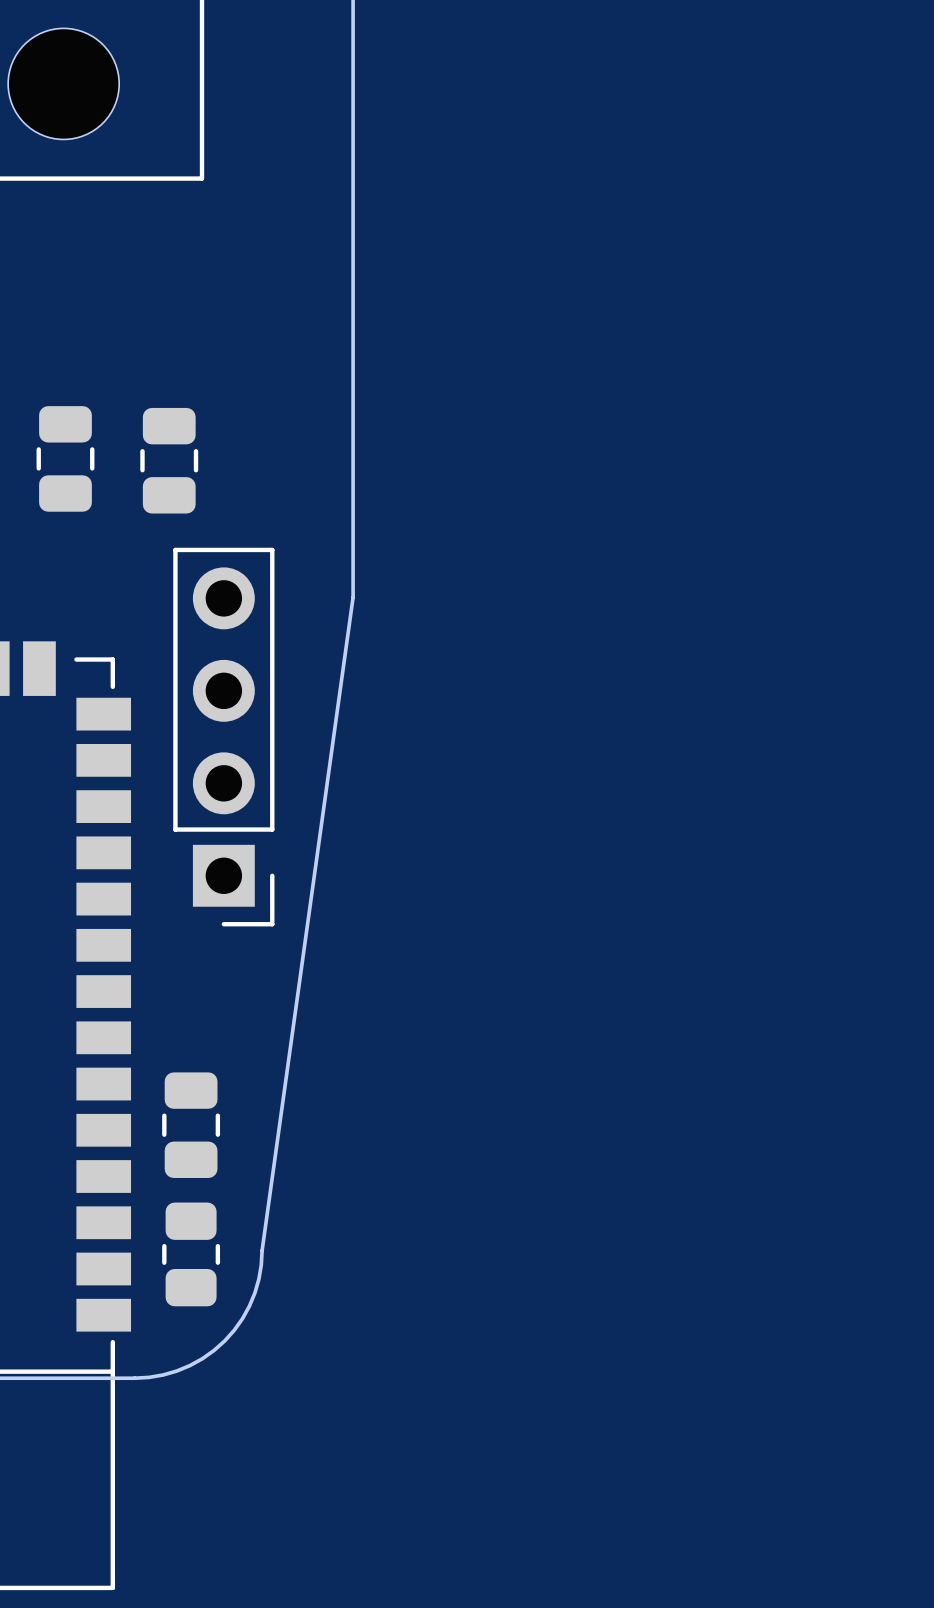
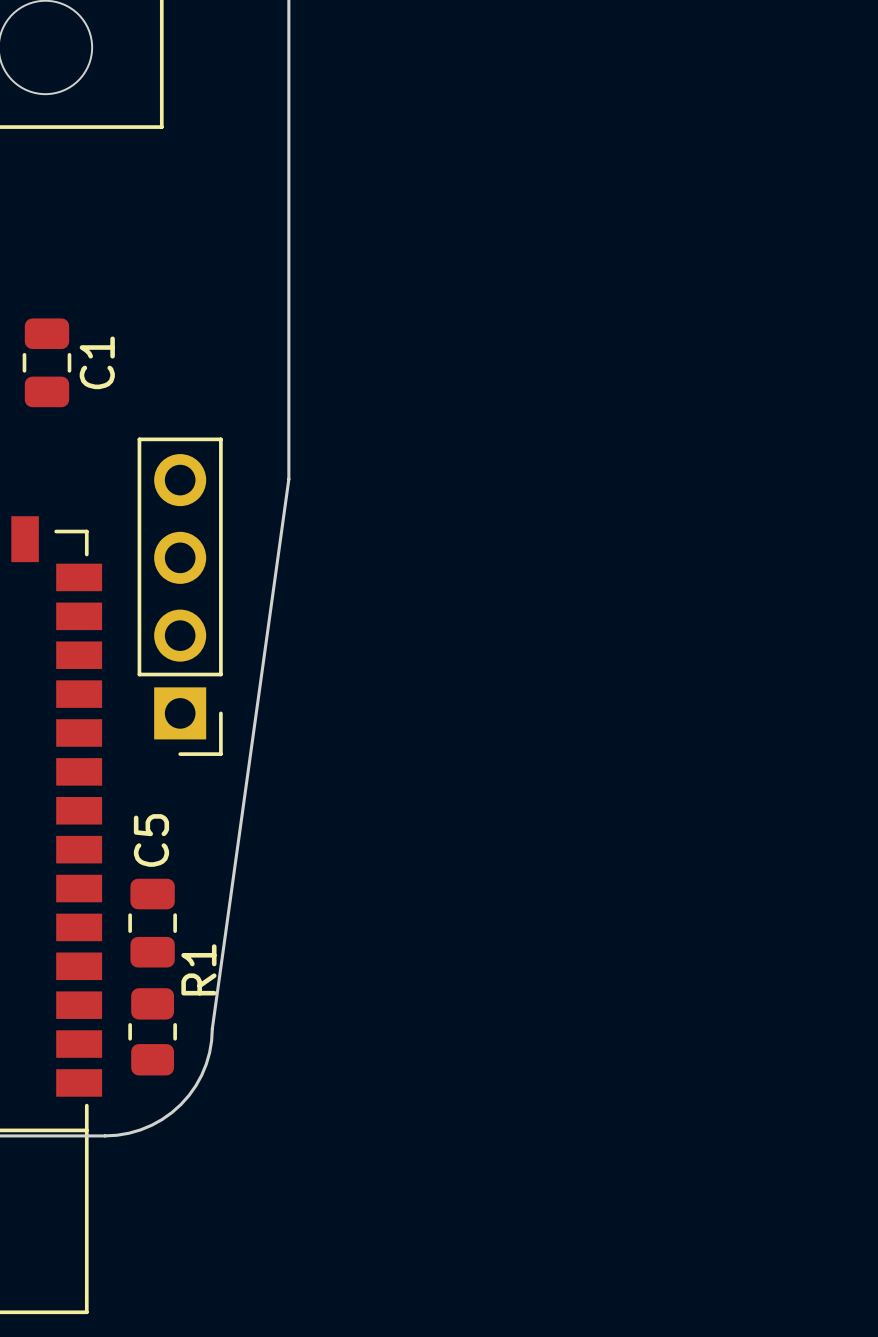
C1 name: none -> C1 (97, 362)
part: (169, 460) -> none
C5 name: none -> C5 (151, 840)
R1 name: none -> R1 (198, 969)

